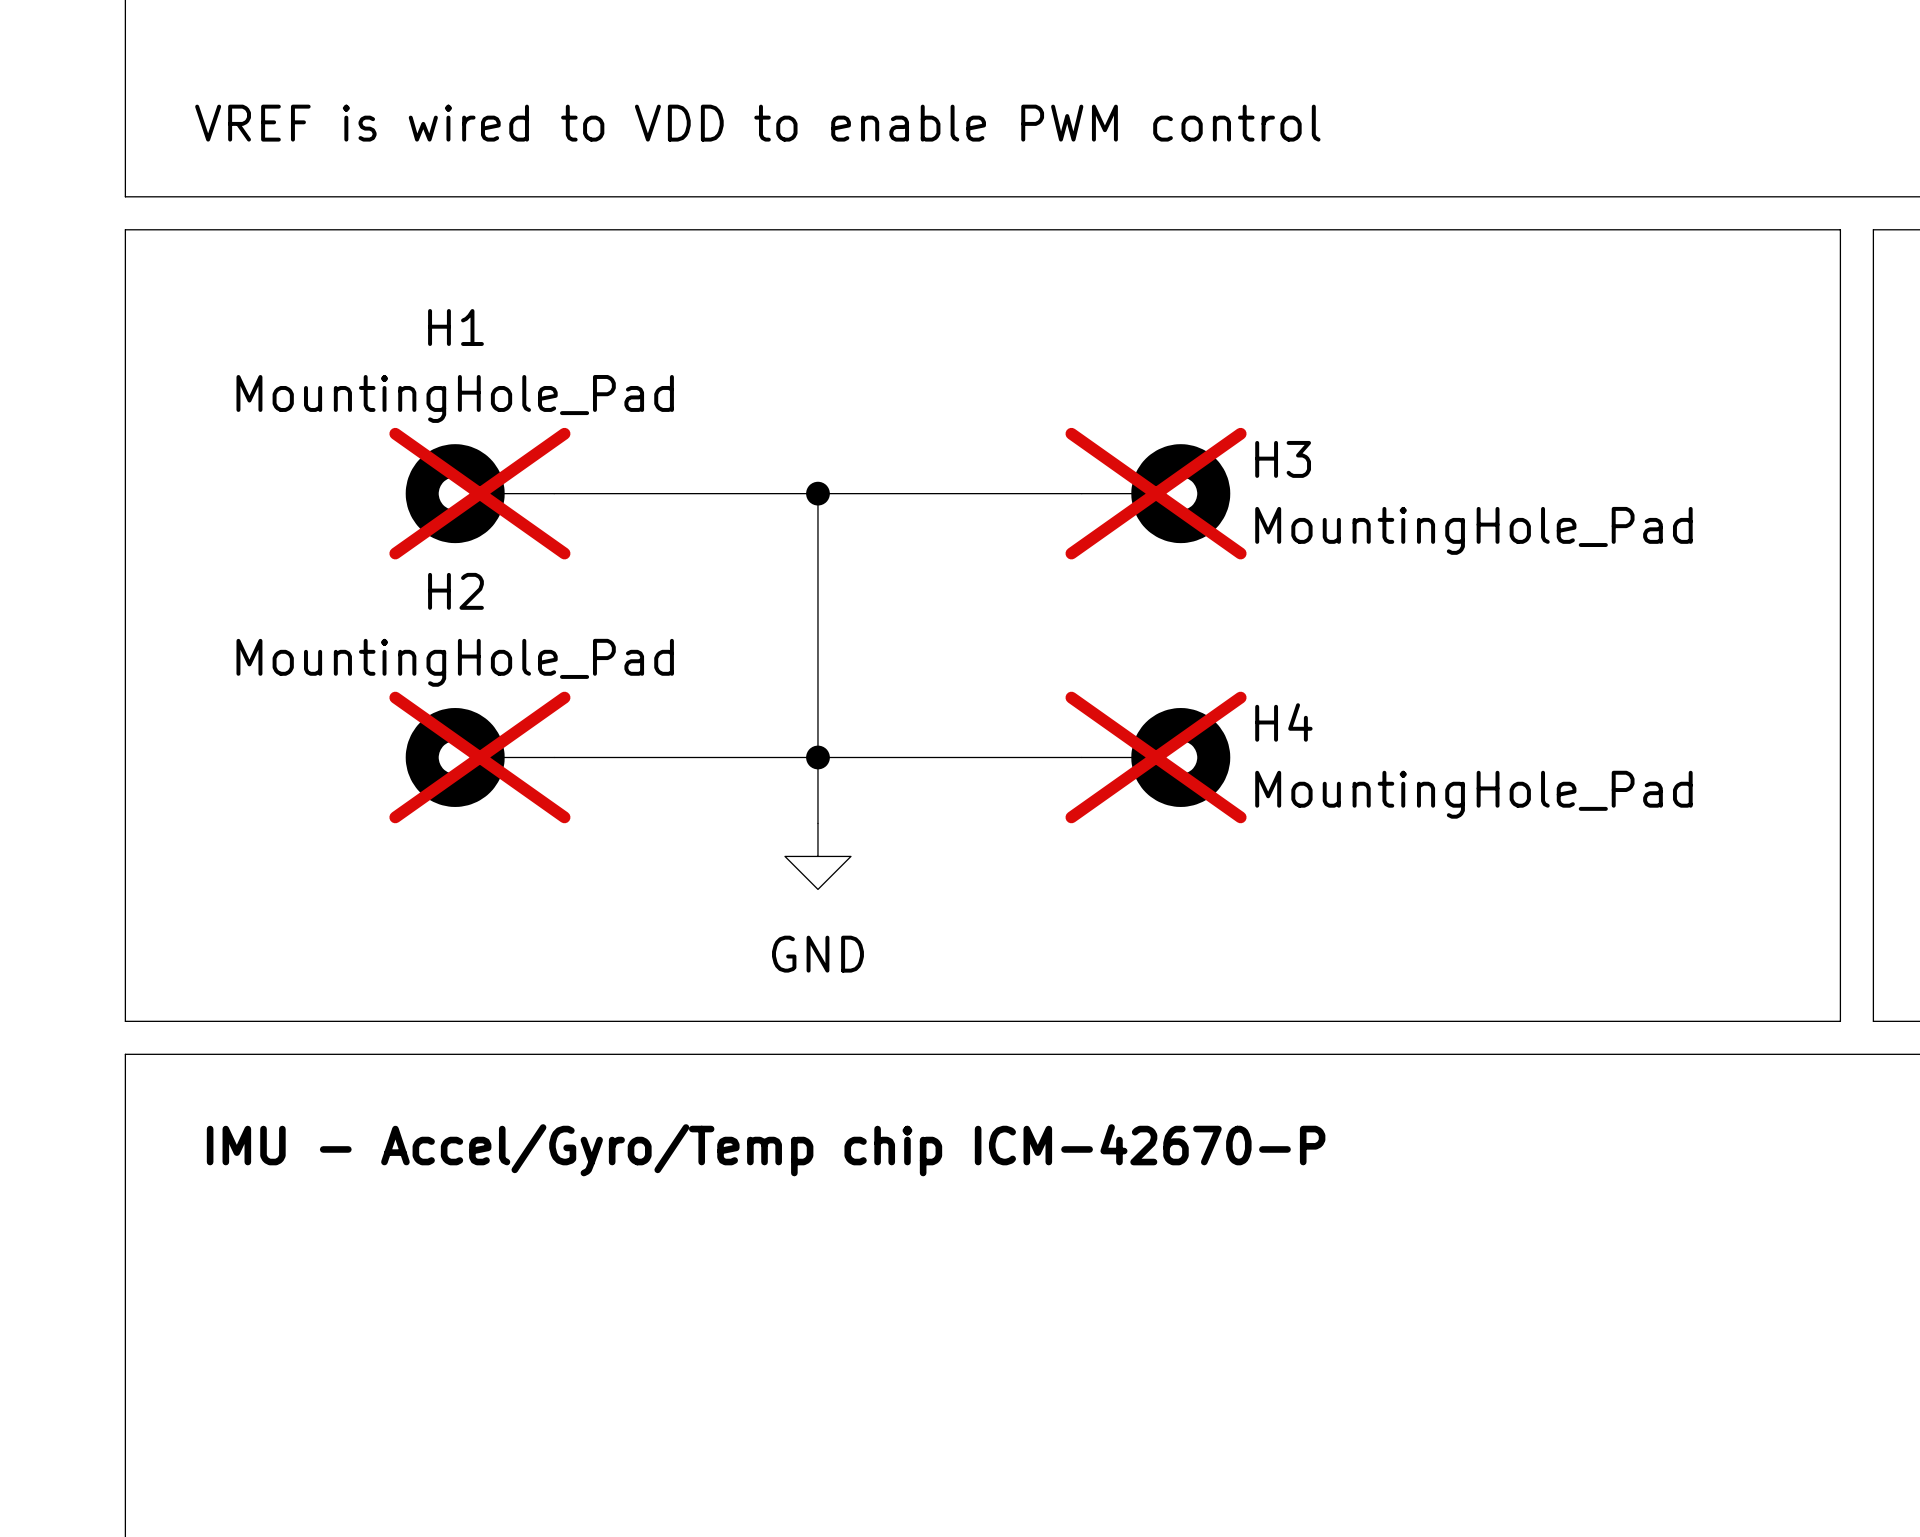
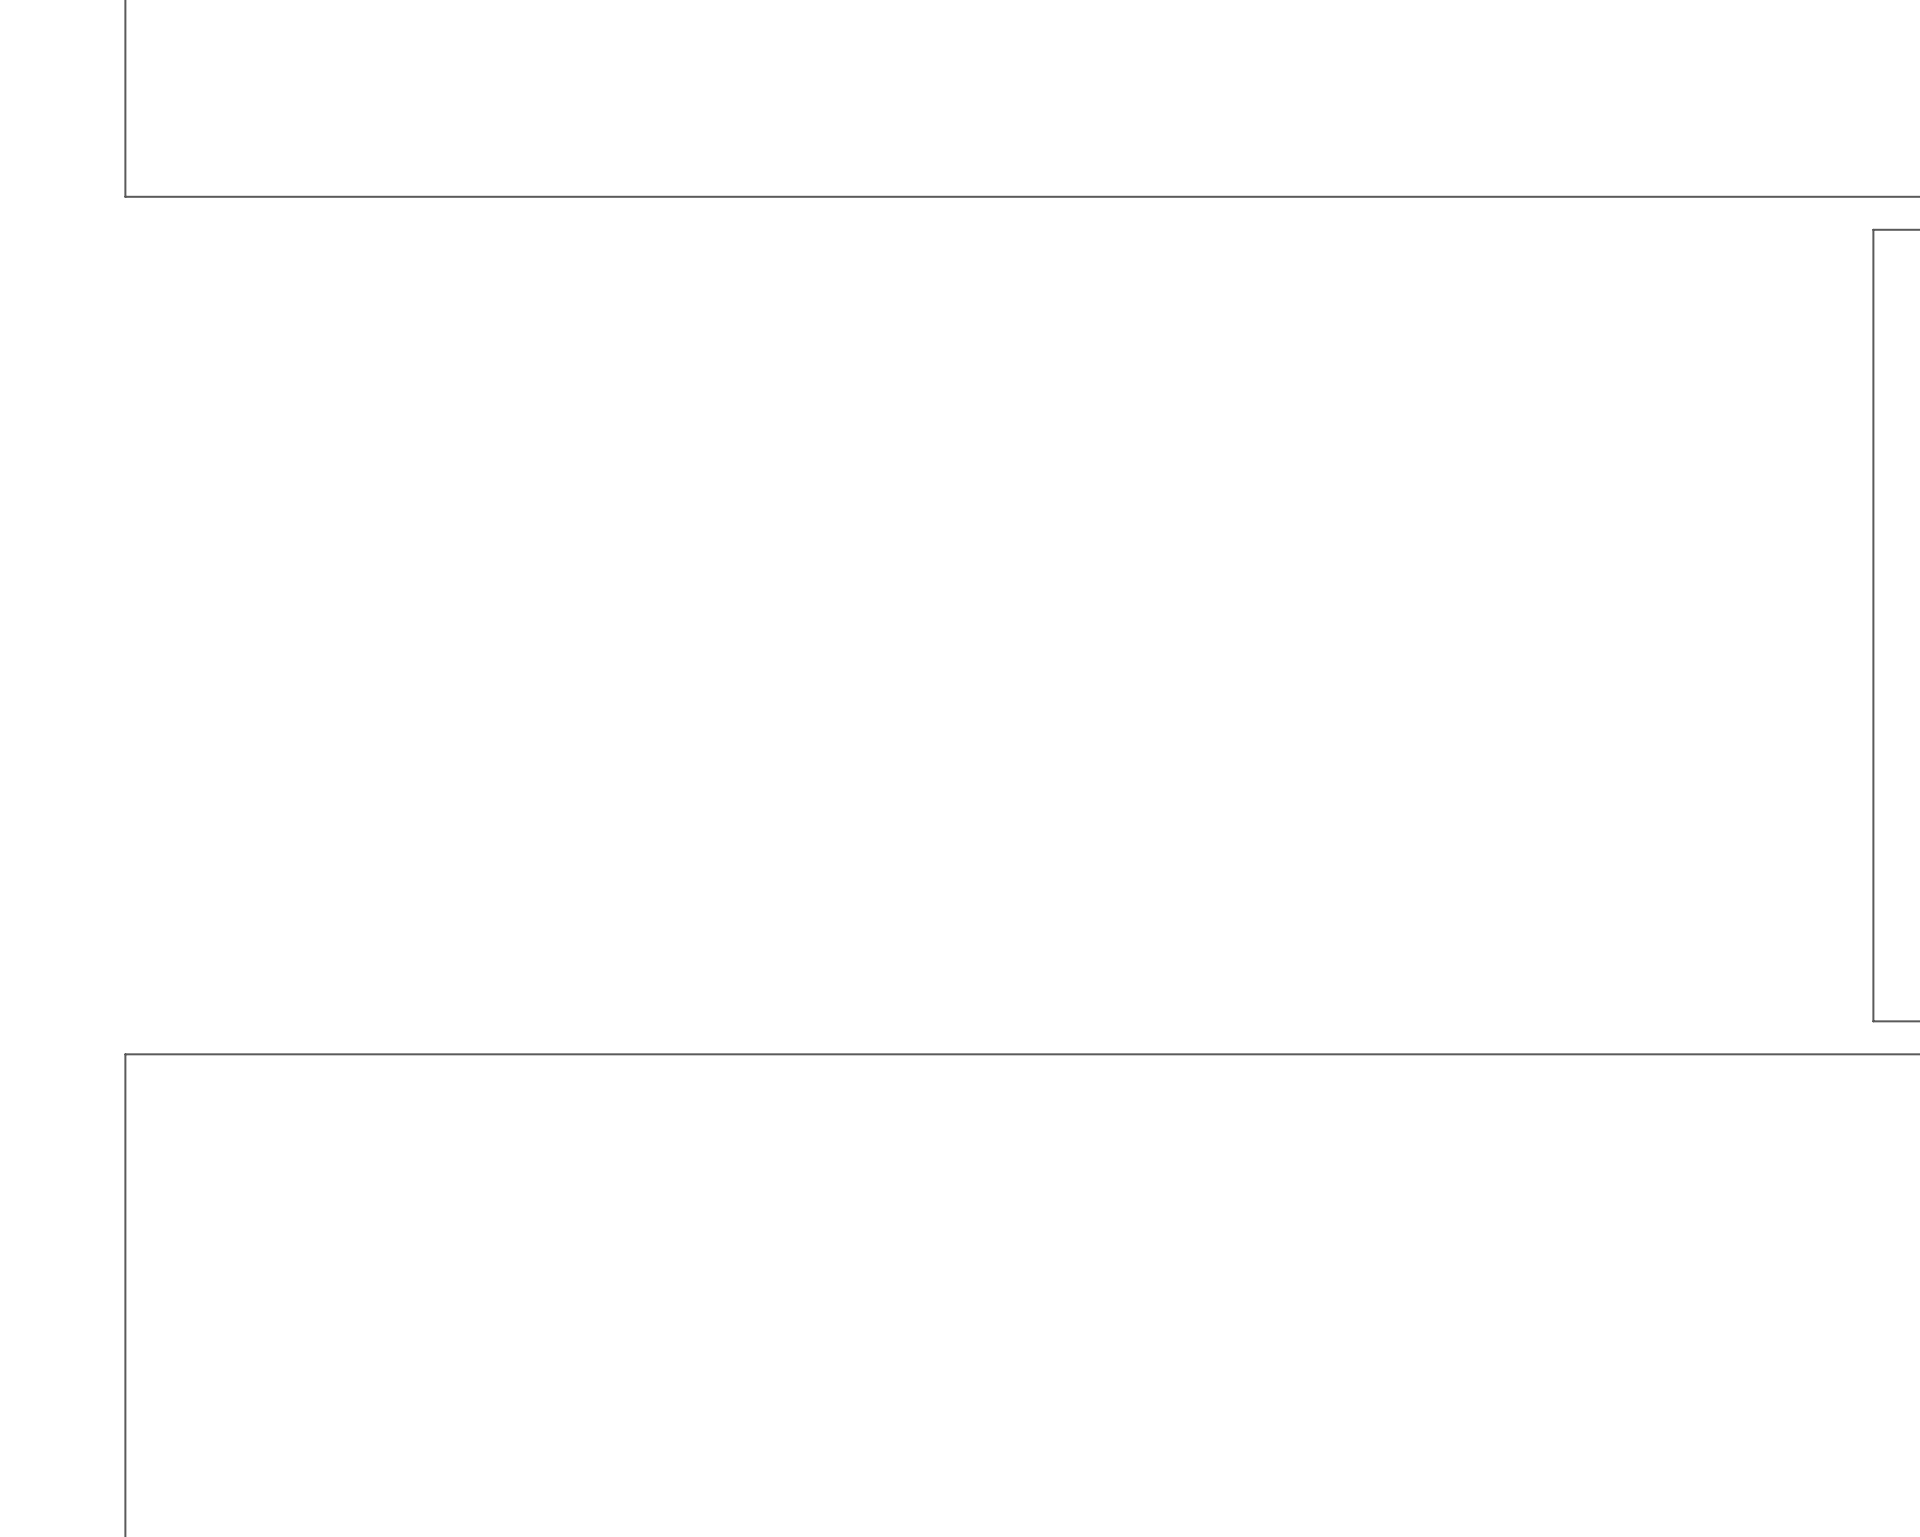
text: VREF is wired to VDD to enable PWM control (757, 123) -> none
line: (125, 229) (125, 1021) (1840, 1021) (1840, 229) (125, 229) -> none
H1: MountingHole_Pad (479, 493) -> none
wire: (554, 493) (1081, 493) -> none
wire: (817, 493) (817, 823) -> none
junction: (817, 493) -> none
H3: MountingHole_Pad (1156, 493) -> none
H2: MountingHole_Pad (479, 757) -> none
wire: (554, 757) (1081, 757) -> none
junction: (817, 757) -> none
H4: MountingHole_Pad (1156, 757) -> none
power symbol: GND (817, 856) -> none
text: IMU - Accel/Gyro/Temp chip ICM-42670-P (766, 1150) -> none

